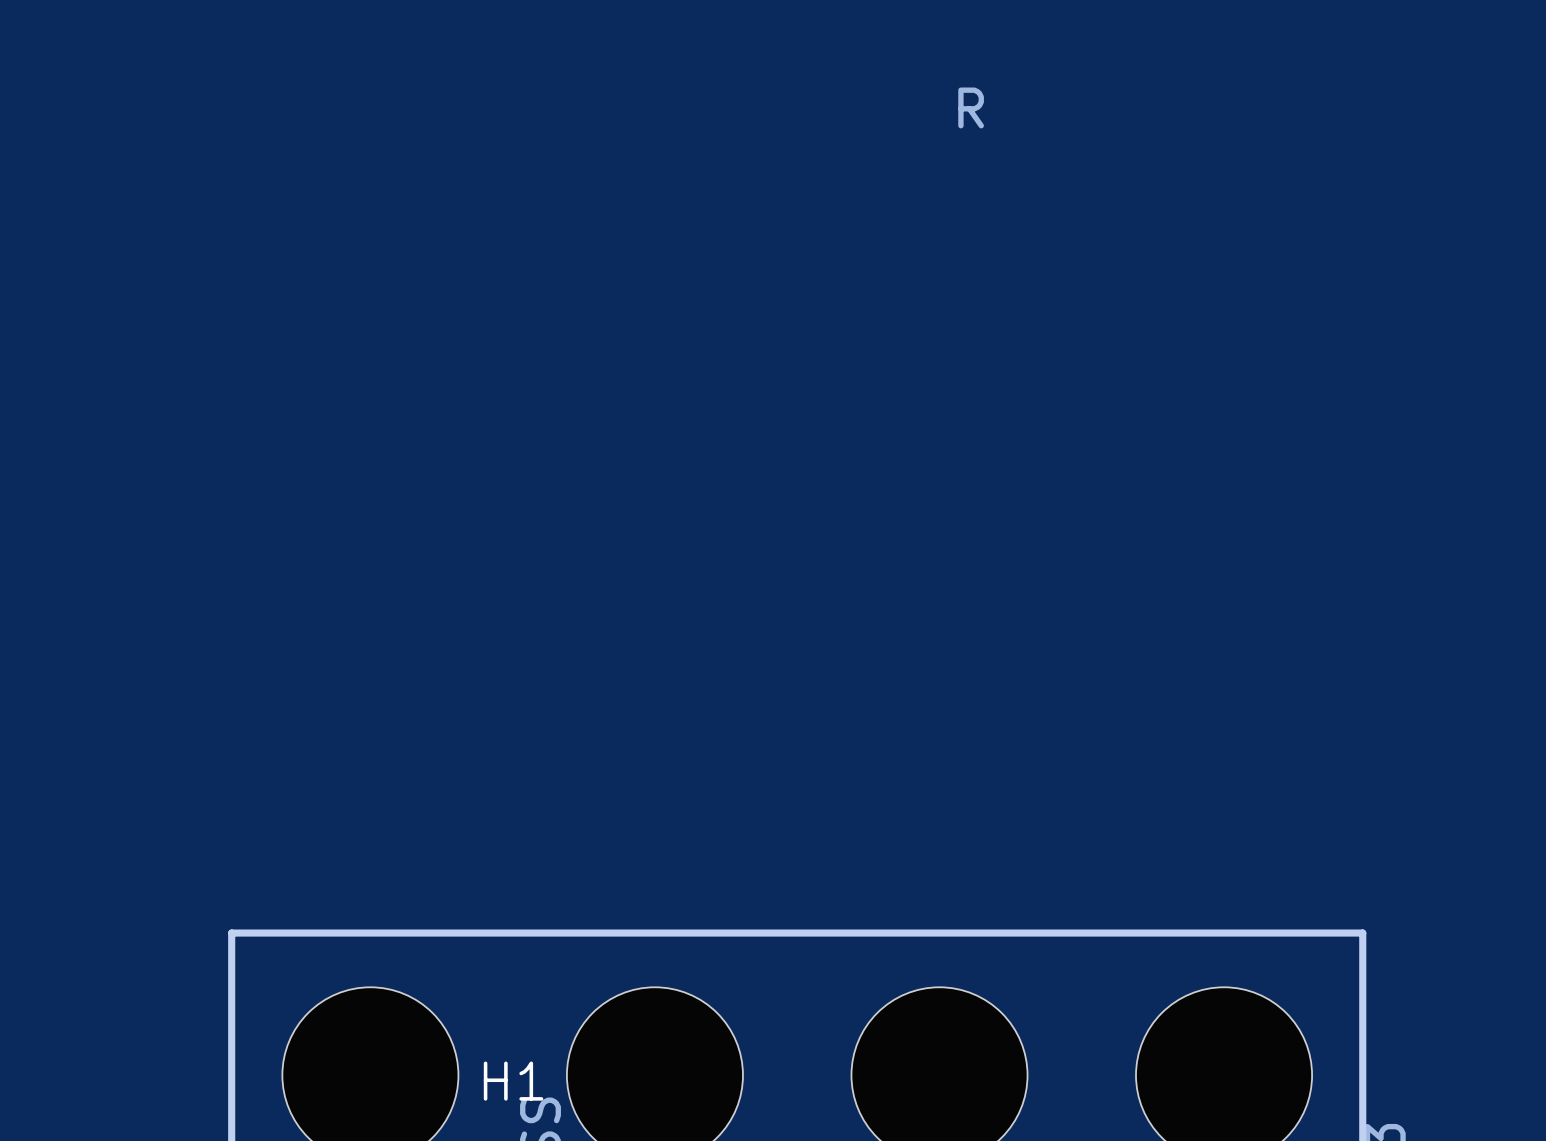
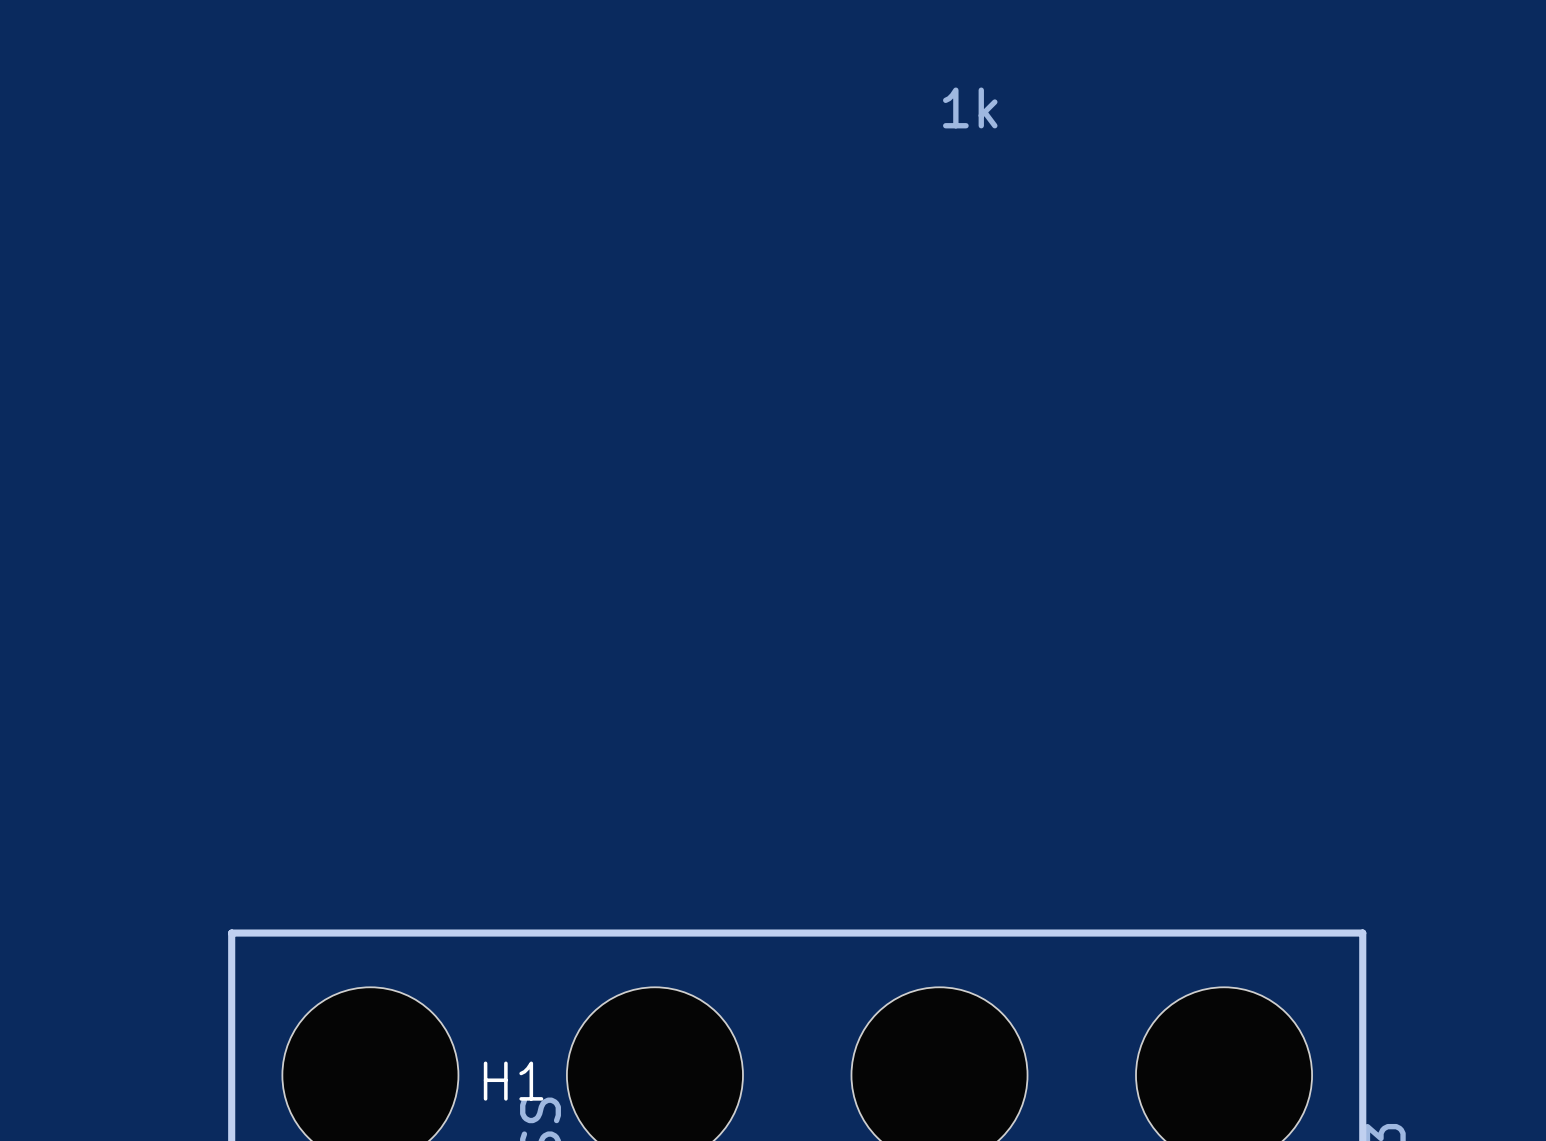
part value: R (971, 107) -> 1k (970, 107)

